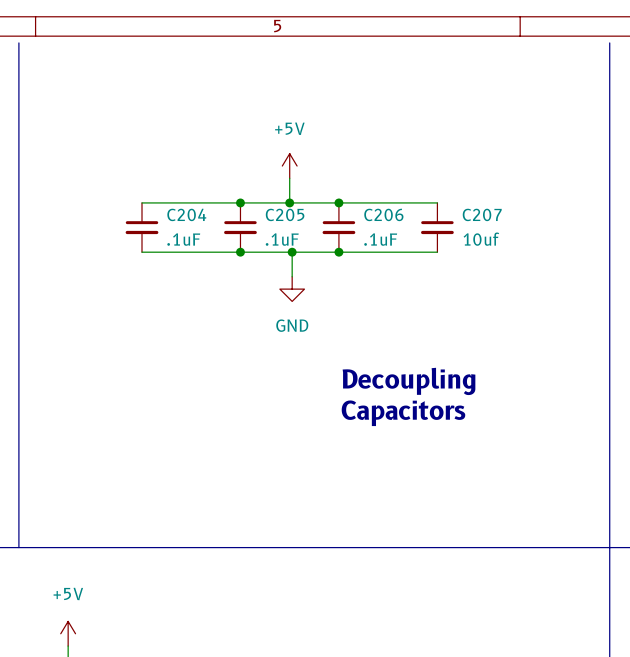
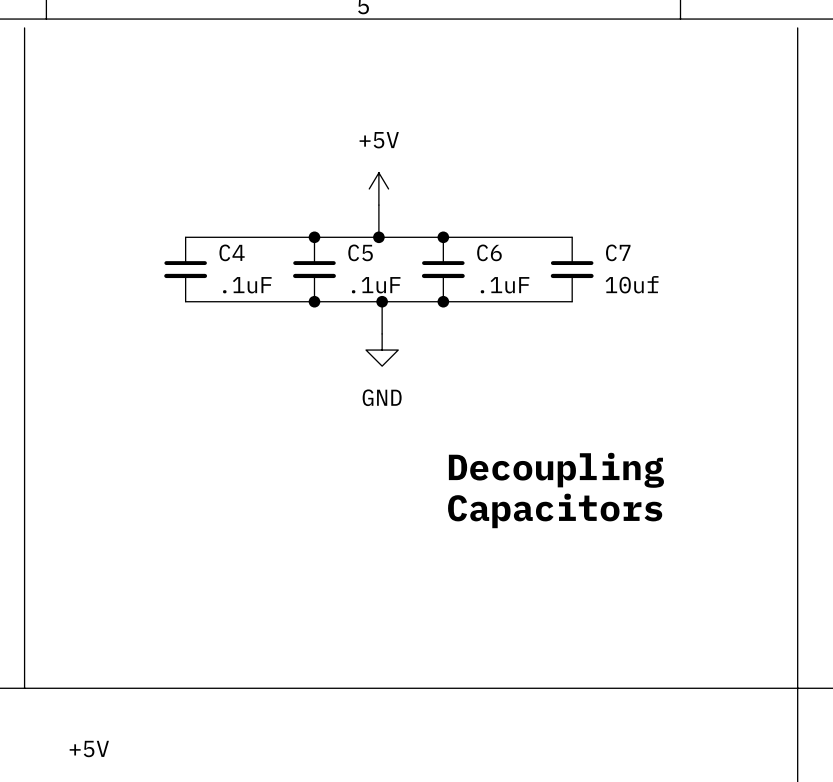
C204 name: C204 (186, 214) -> C4 (232, 252)
C205 name: C205 (285, 214) -> C5 (360, 252)
C206 name: C206 (383, 214) -> C6 (489, 252)
C207 name: C207 (482, 214) -> C7 (618, 252)

